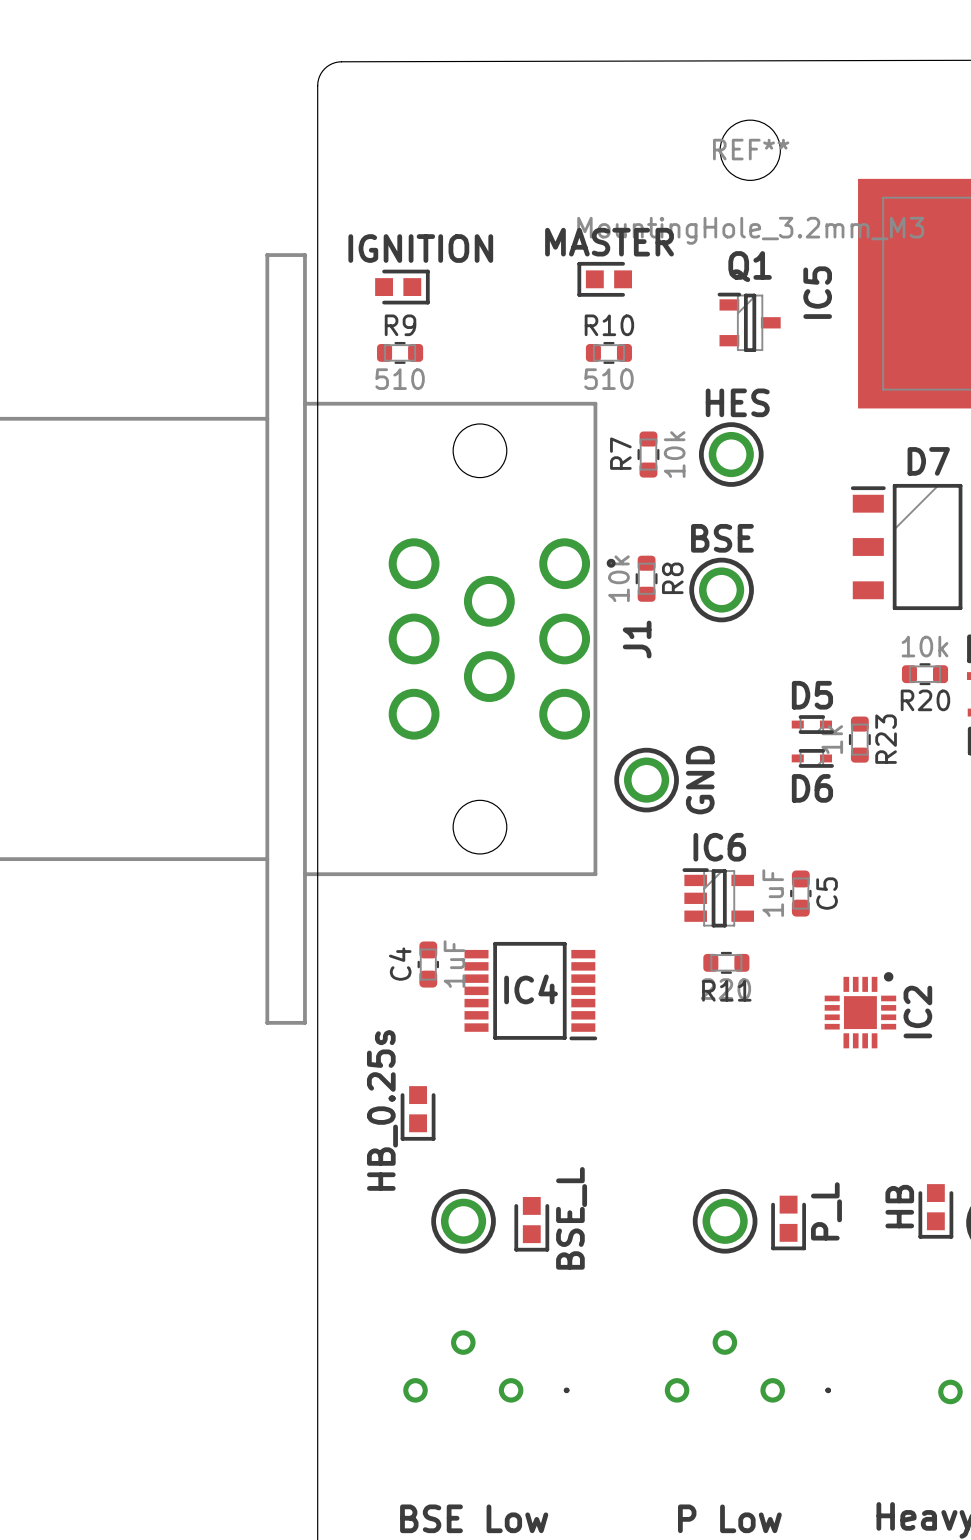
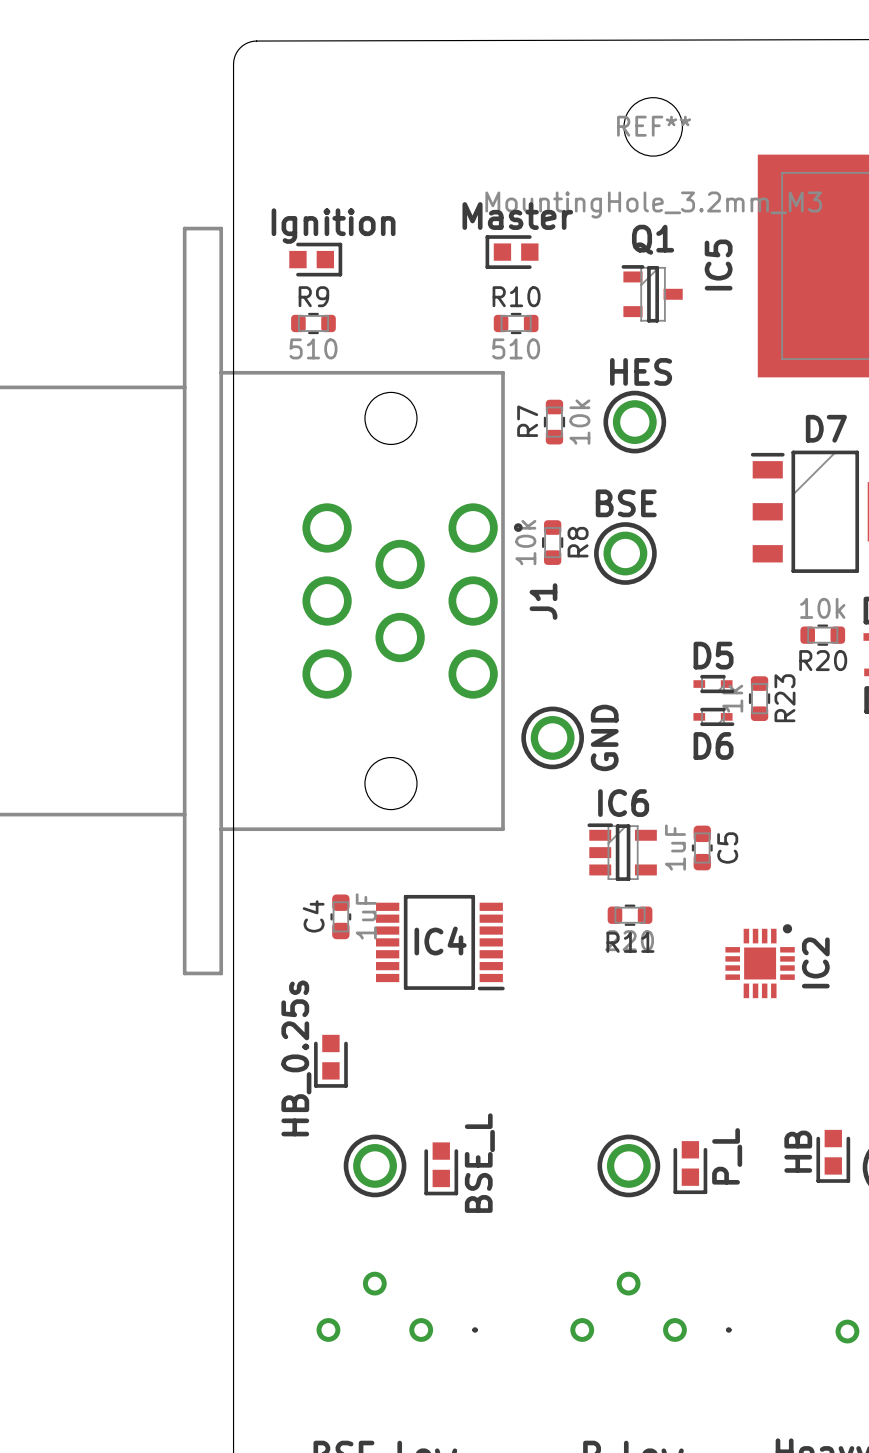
MASTER name: MASTER (609, 242) -> Master (517, 216)
IGNITION name: IGNITION (420, 248) -> Ignition (333, 226)

